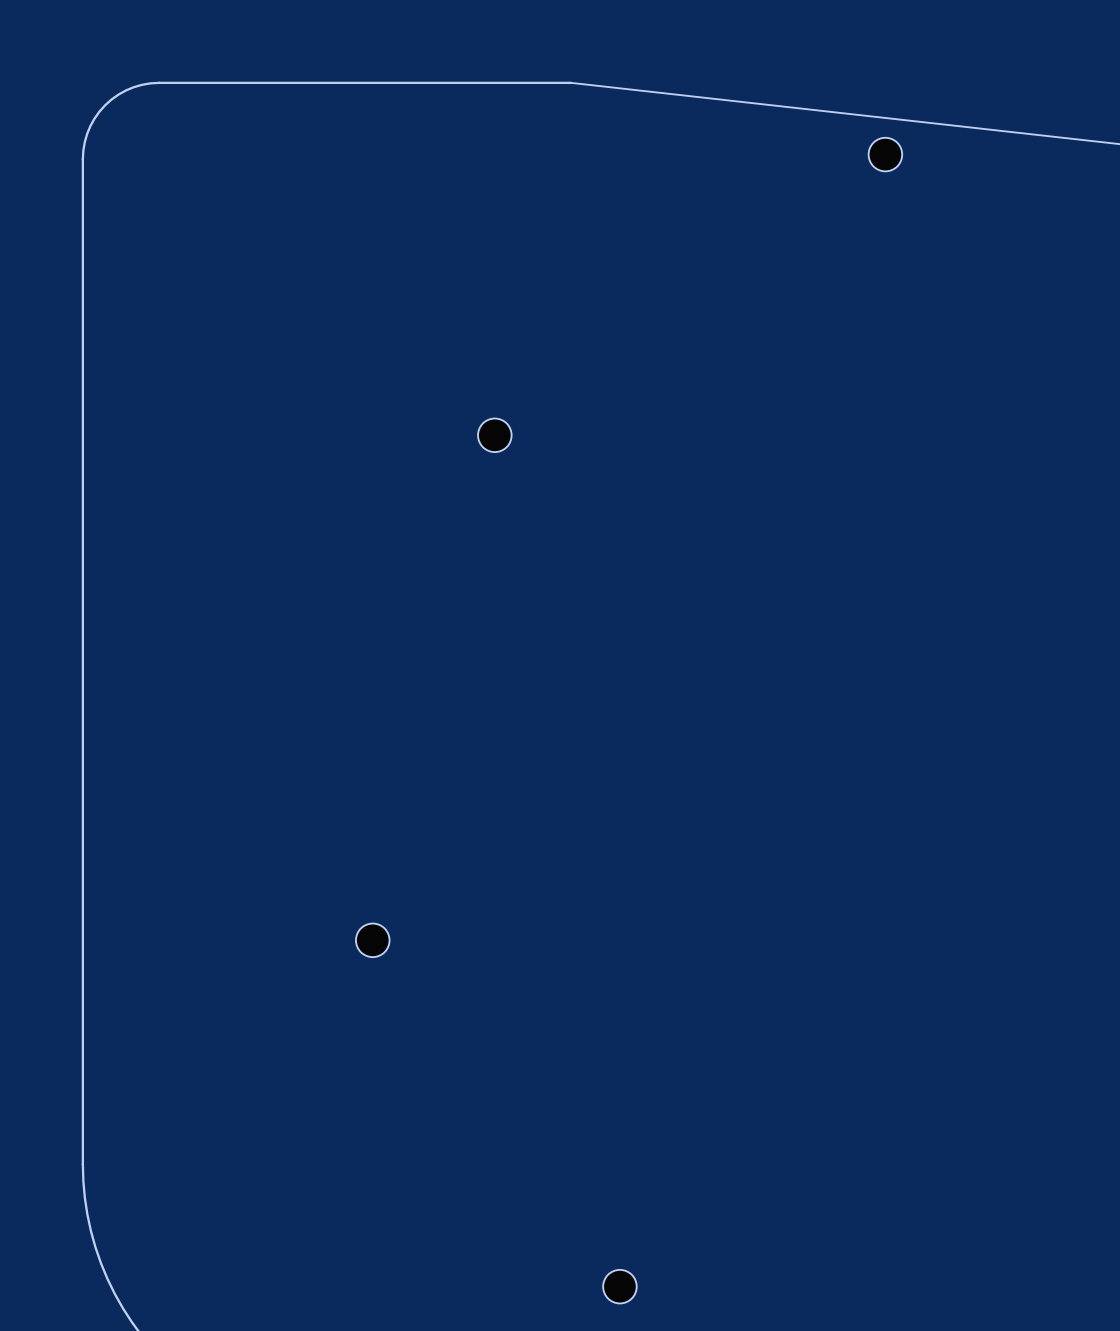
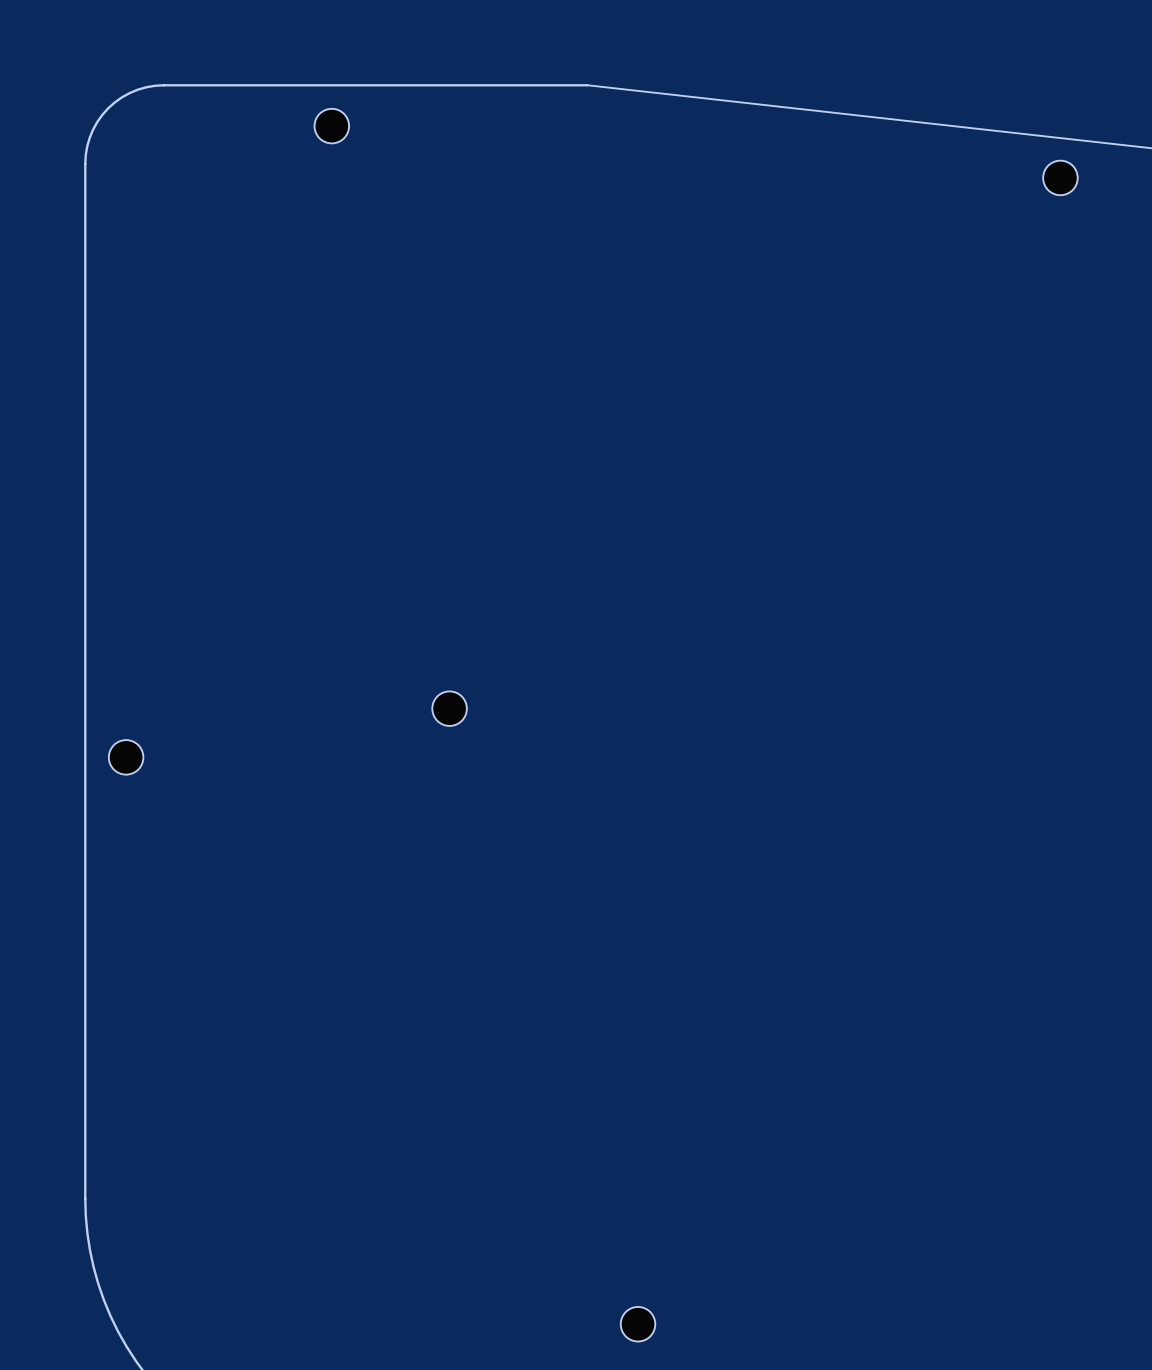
part: none -> (331, 126)
part position: (885, 154) -> (1060, 177)
part: (494, 435) -> none
part: none -> (449, 708)
part: none -> (126, 757)
part: (372, 940) -> none

